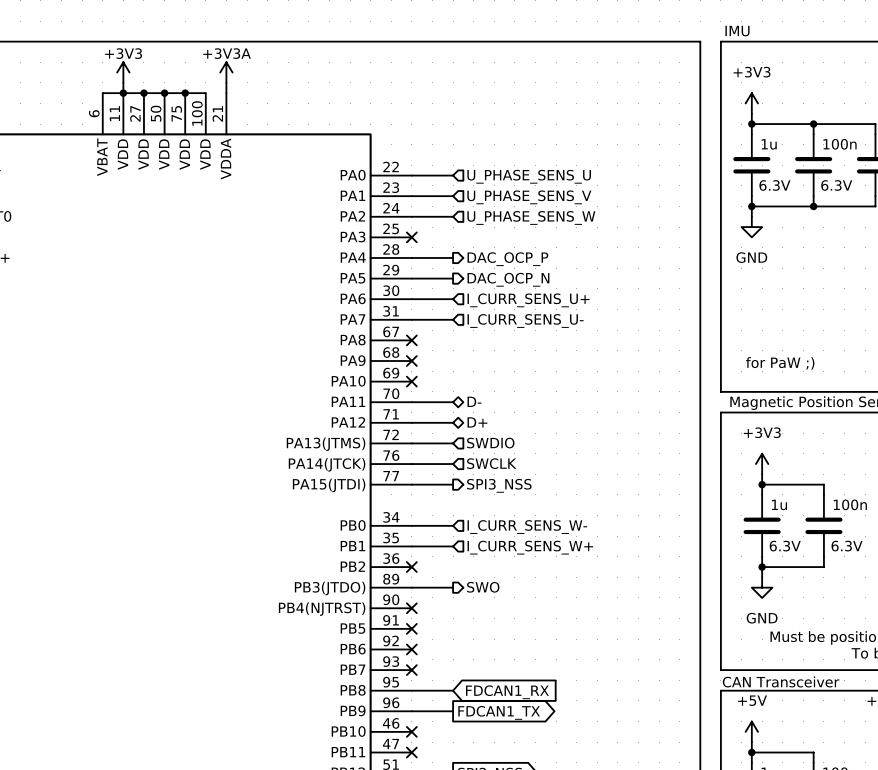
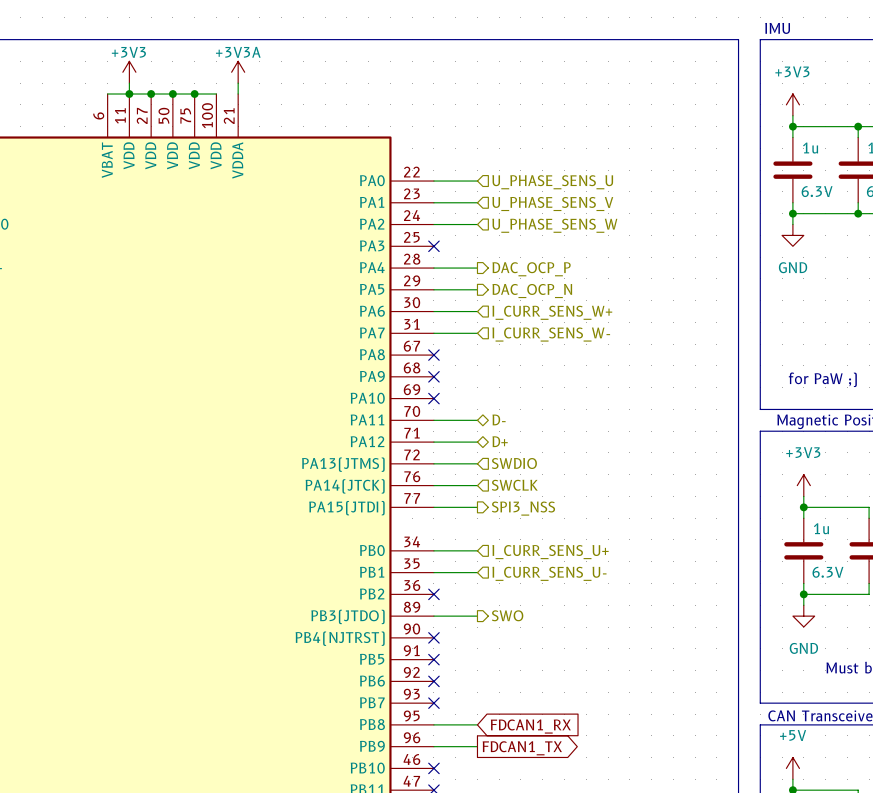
hierarchical label: I_CURR_SENS_U+ (528, 300) -> I_CURR_SENS_W+ (552, 312)
hierarchical label: I_CURR_SENS_U- (525, 320) -> I_CURR_SENS_W- (551, 334)
hierarchical label: I_CURR_SENS_W- (527, 527) -> I_CURR_SENS_U+ (550, 552)
hierarchical label: I_CURR_SENS_W+ (530, 547) -> I_CURR_SENS_U- (549, 573)

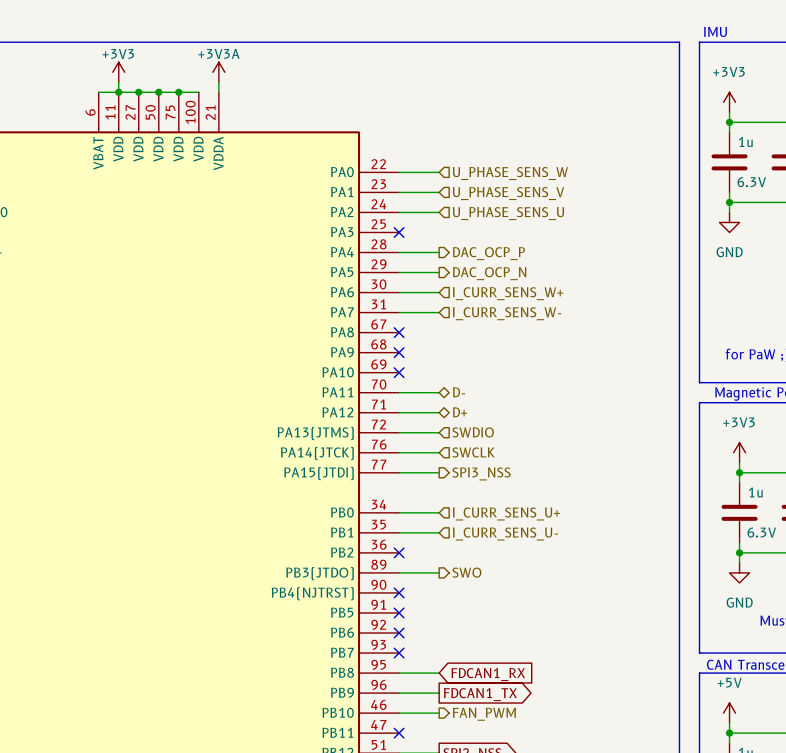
hierarchical label: U_PHASE_SENS_U (552, 182) -> U_PHASE_SENS_W (510, 173)
hierarchical label: U_PHASE_SENS_W (554, 225) -> U_PHASE_SENS_U (508, 213)
wire: none -> (399, 713) (439, 713)
no-connect mark: (433, 768) -> none
hierarchical label: none -> FAN_PWM (484, 714)

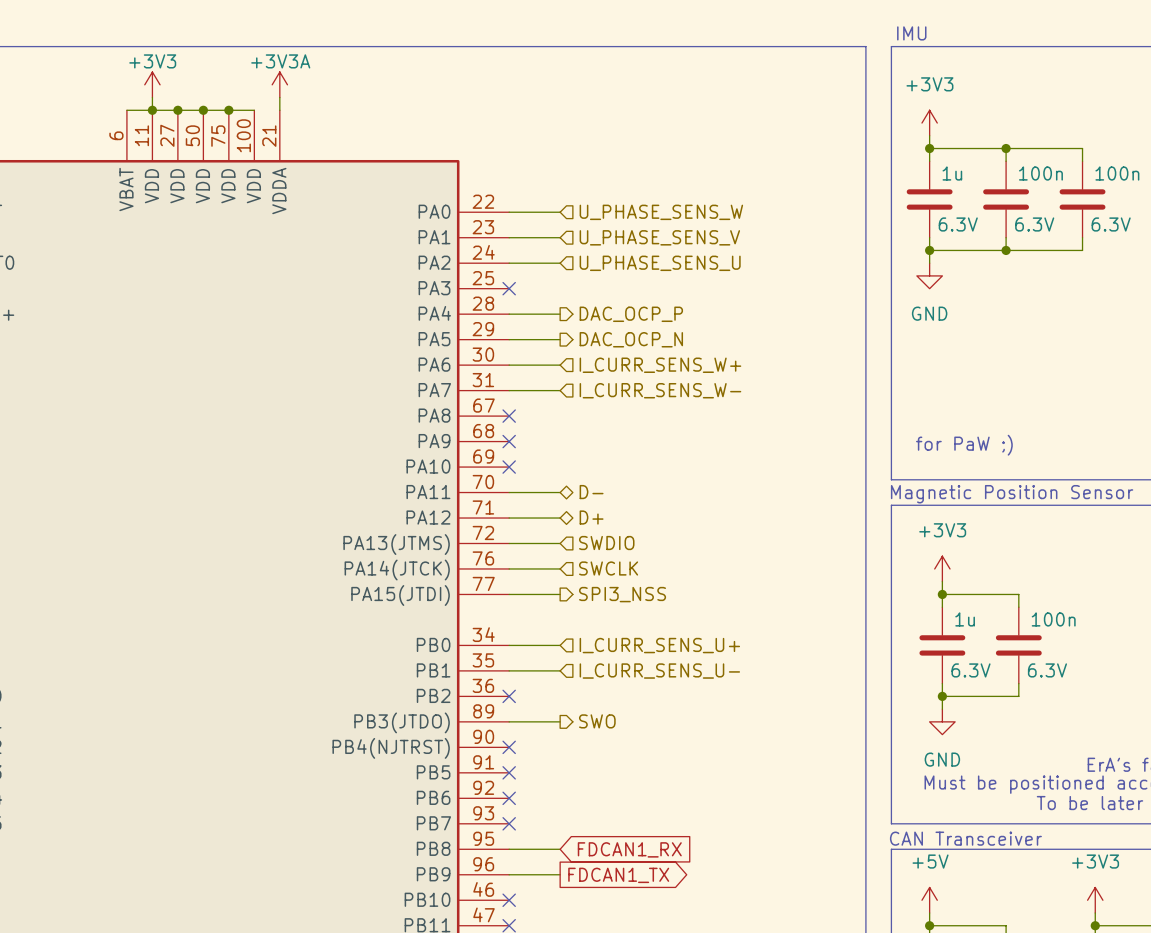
wire: (399, 713) (439, 713) -> none
no-connect mark: none -> (509, 900)
hierarchical label: FAN_PWM (484, 714) -> none

